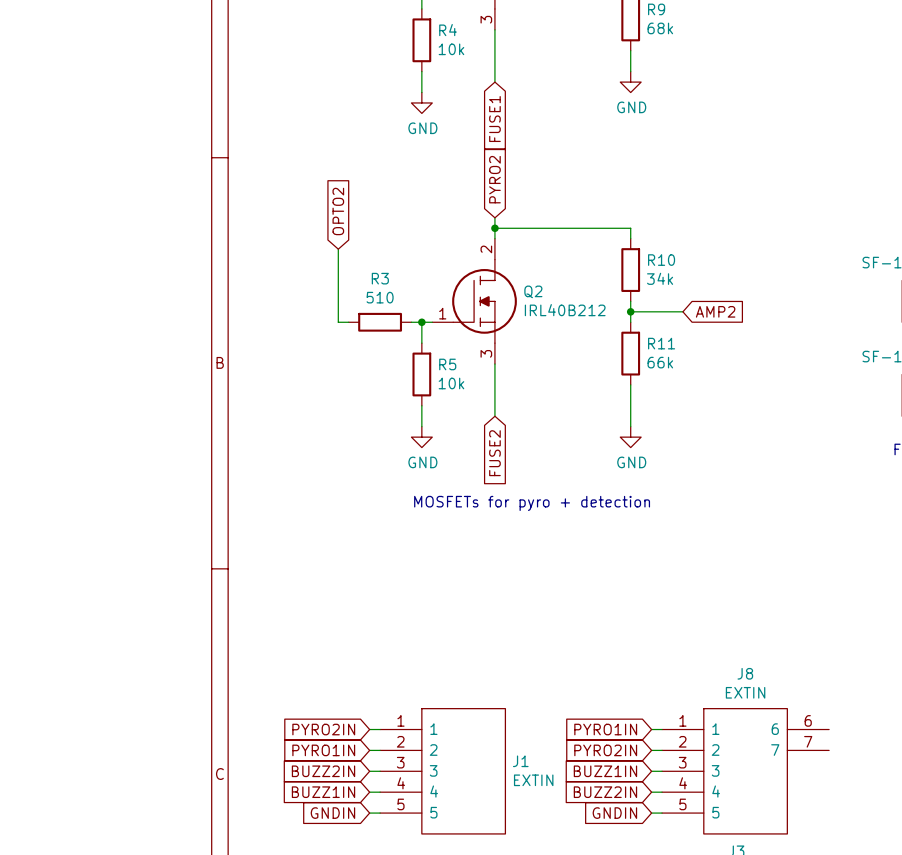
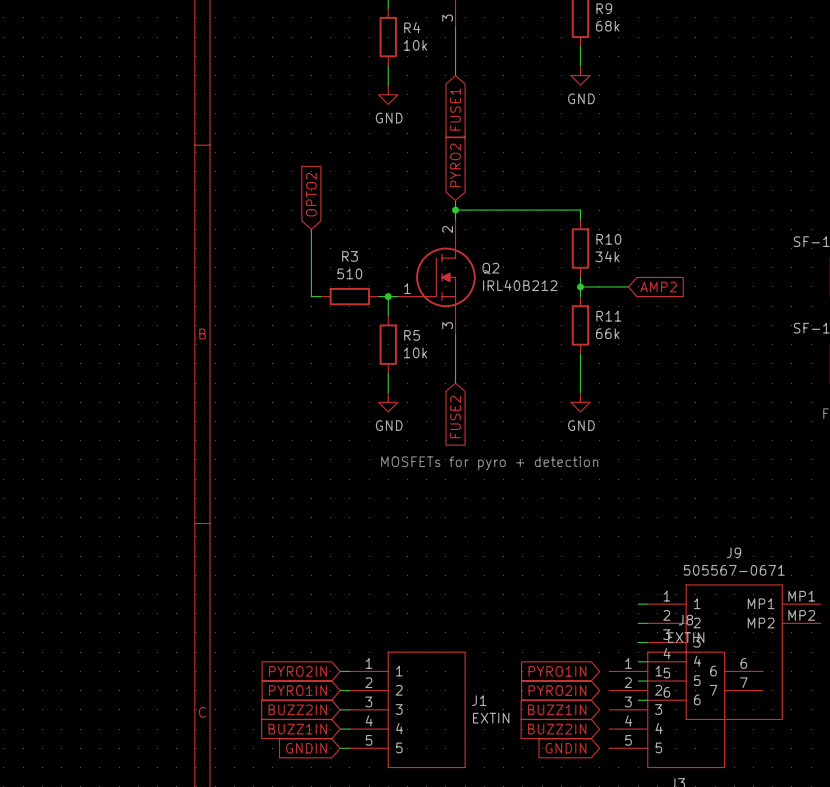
wire: none -> (638, 604) (647, 604)
J9: none -> 505567-0671 (734, 652)
wire: (651, 729) (662, 729) -> (638, 623) (647, 623)
wire: (651, 750) (662, 750) -> (638, 642) (647, 642)
wire: (651, 771) (662, 771) -> (638, 661) (647, 661)
wire: (651, 792) (662, 792) -> (638, 681) (647, 681)
wire: (651, 813) (662, 813) -> (638, 700) (647, 700)

